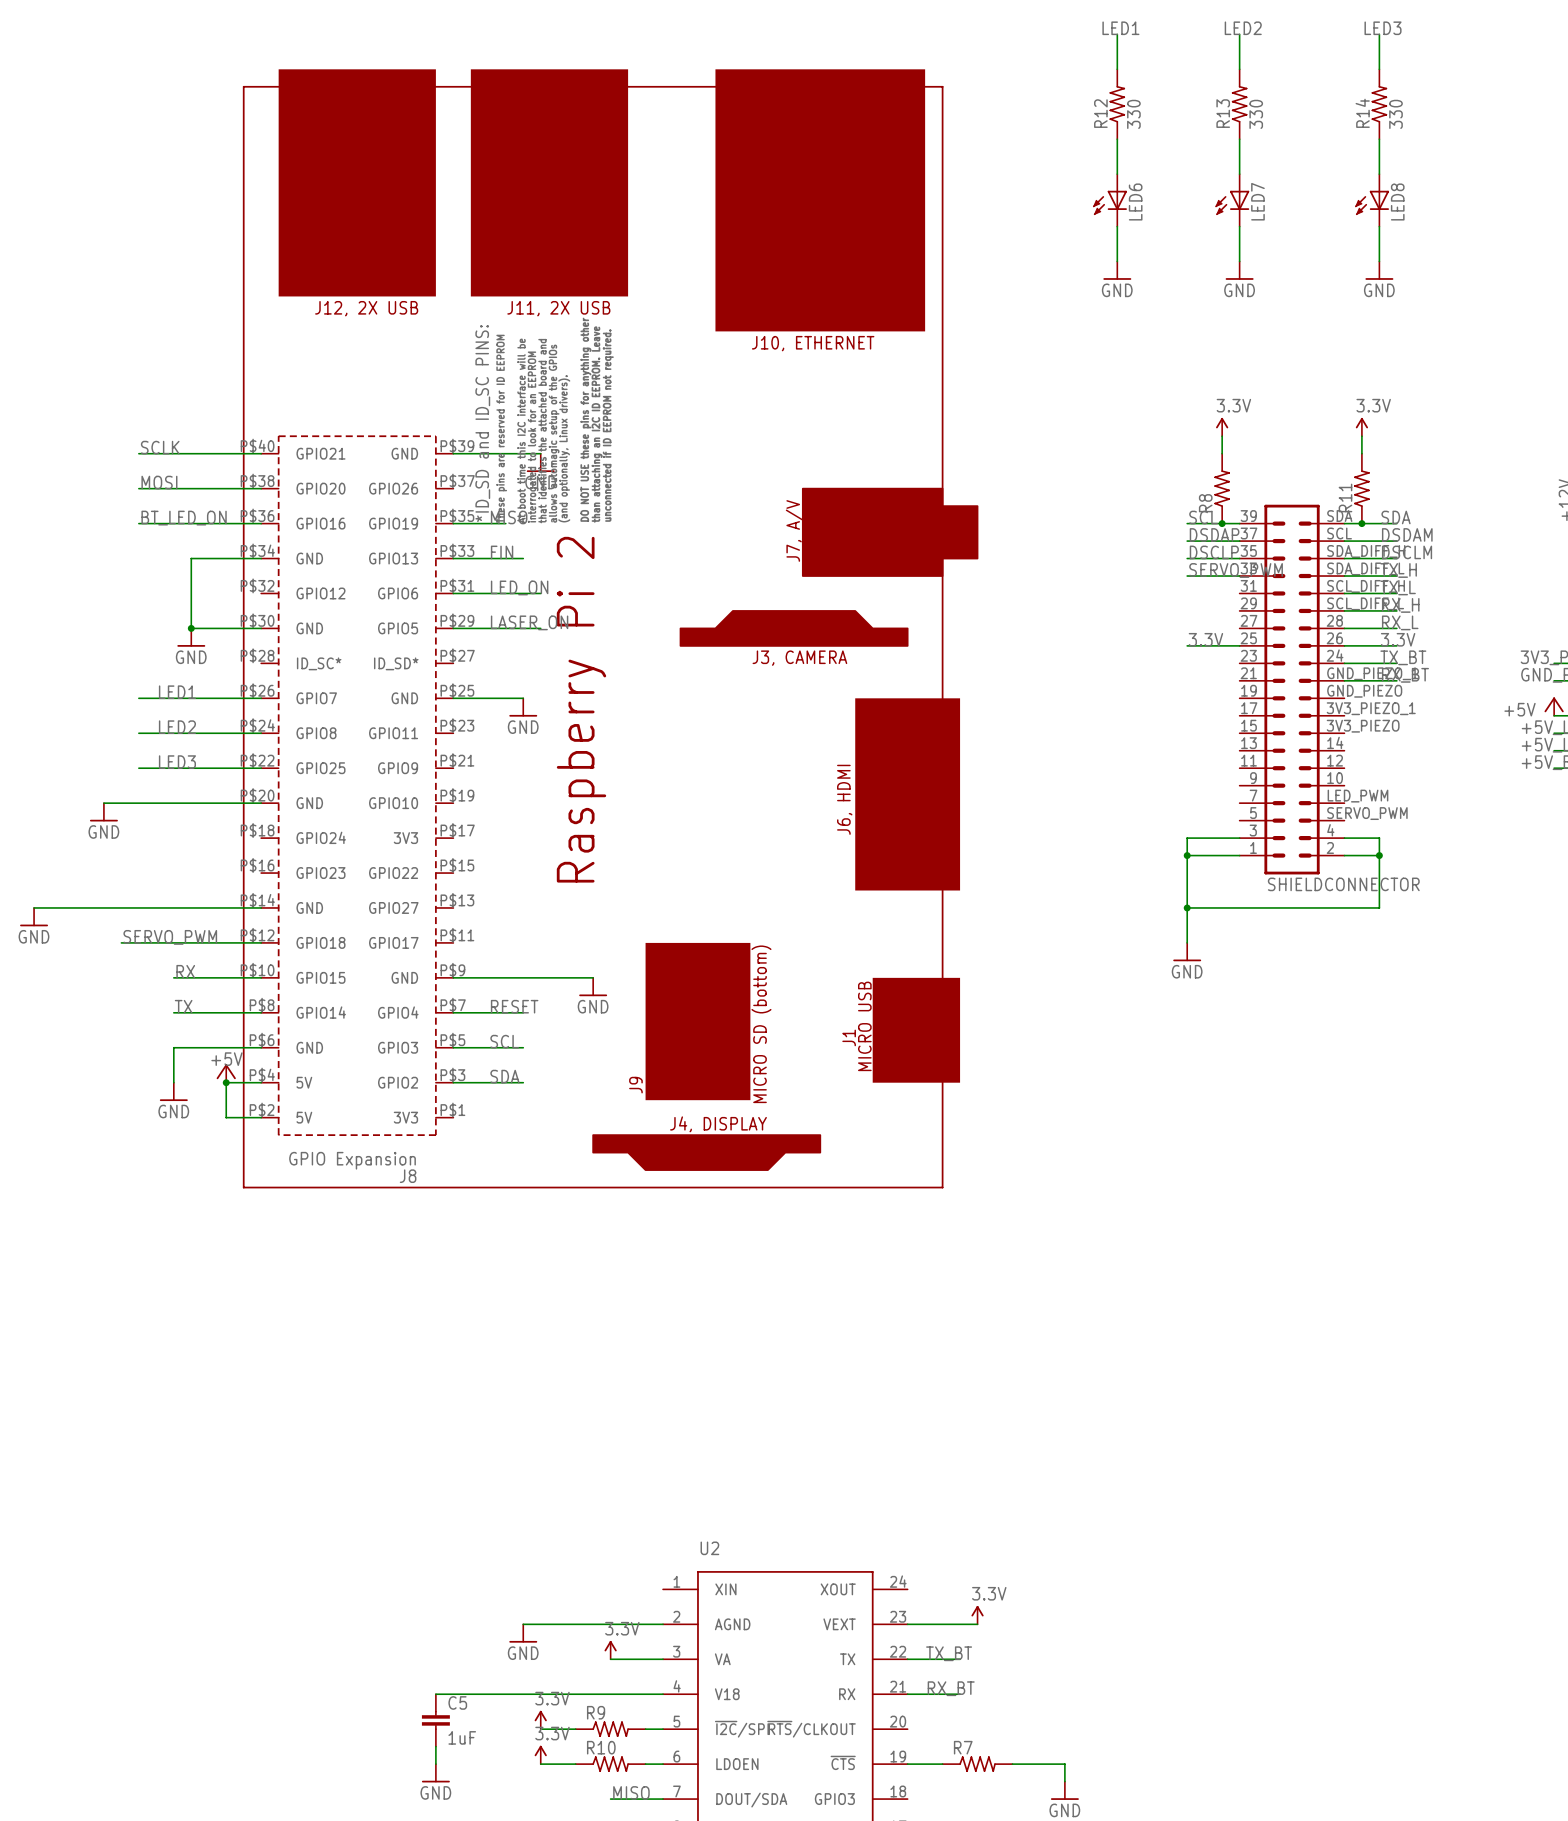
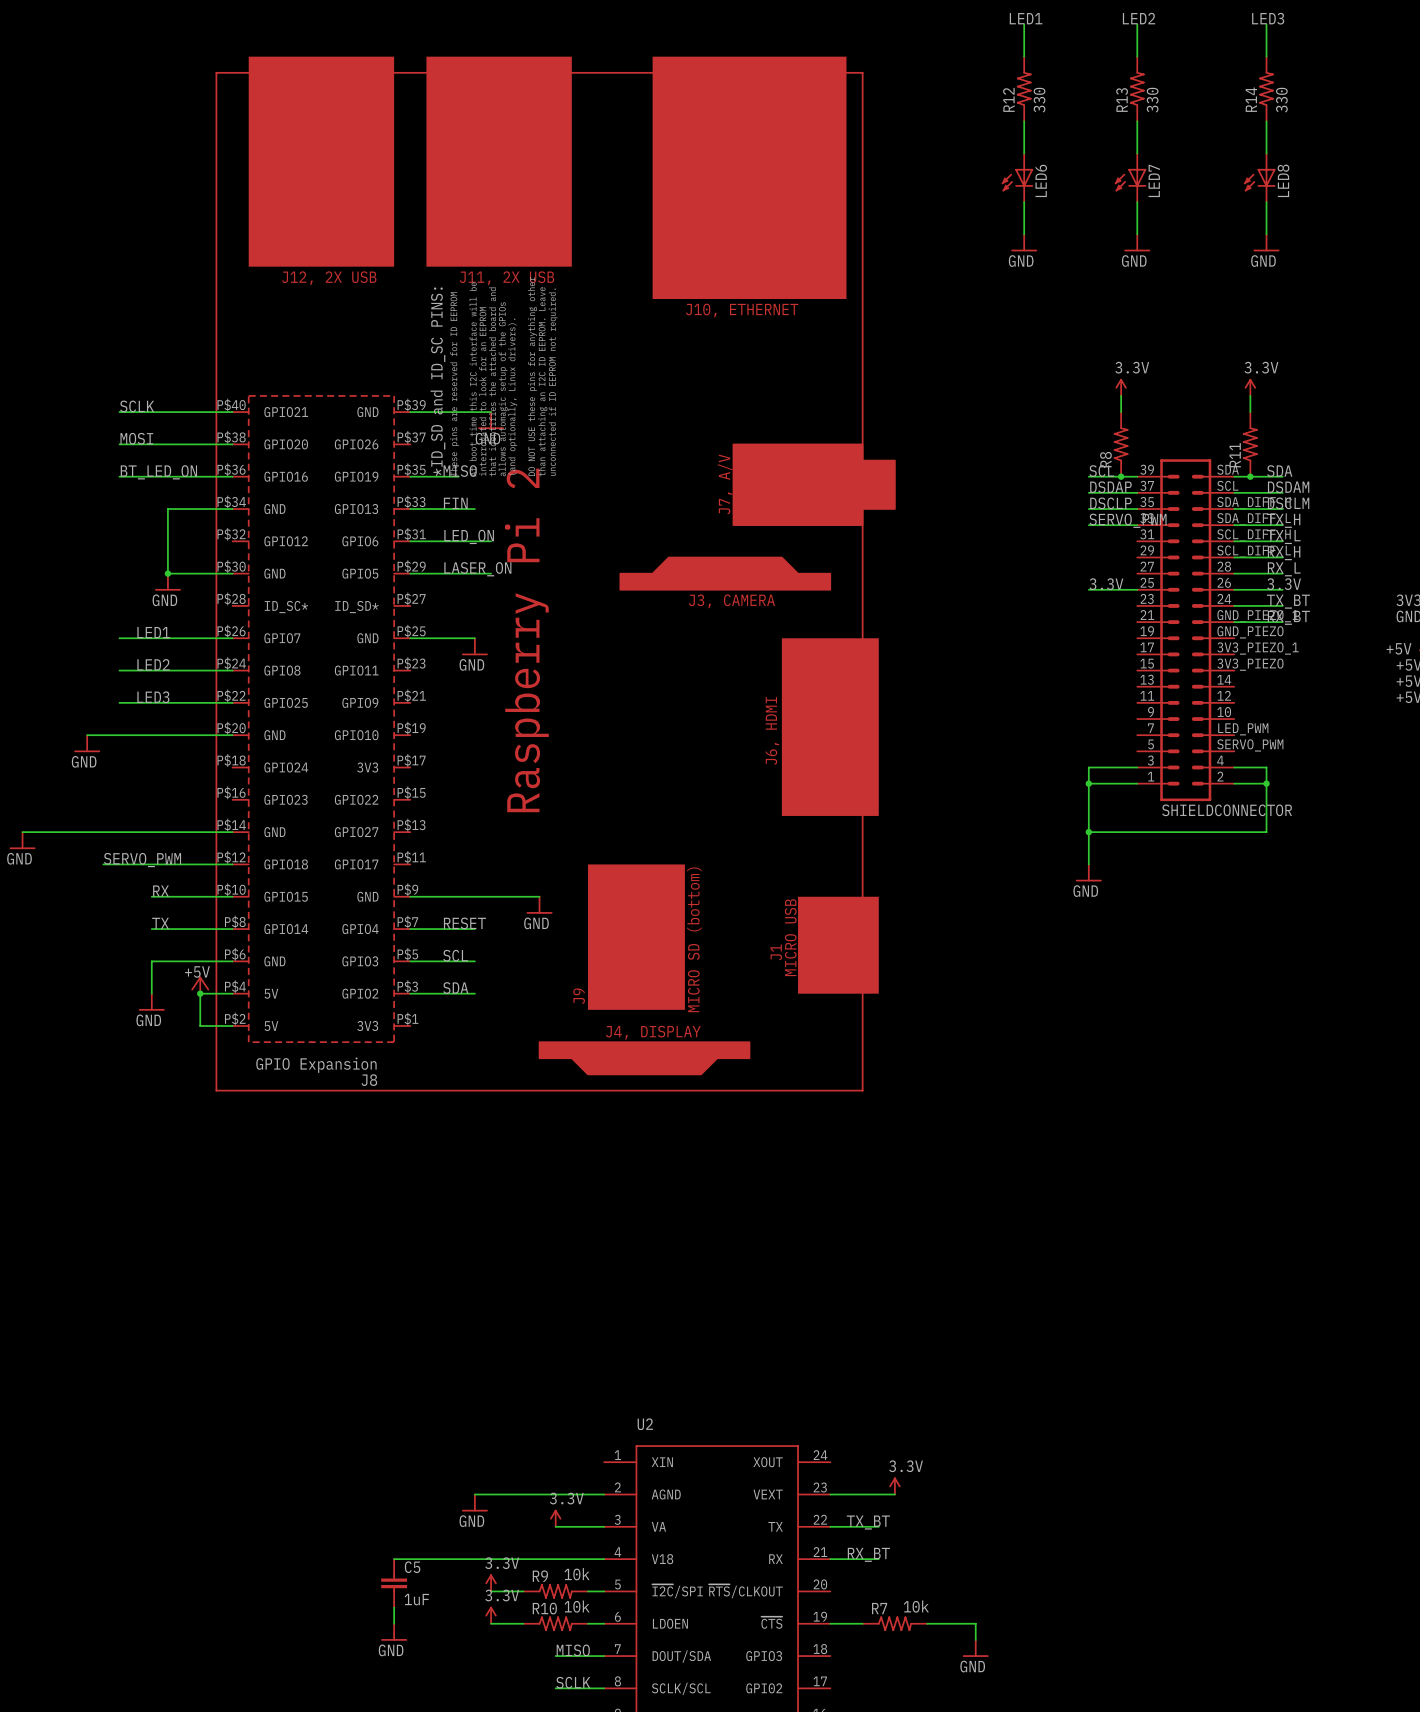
R9 value: none -> 10k (577, 1574)
R10 value: none -> 10k (577, 1606)
R7 value: none -> 10k (916, 1606)

